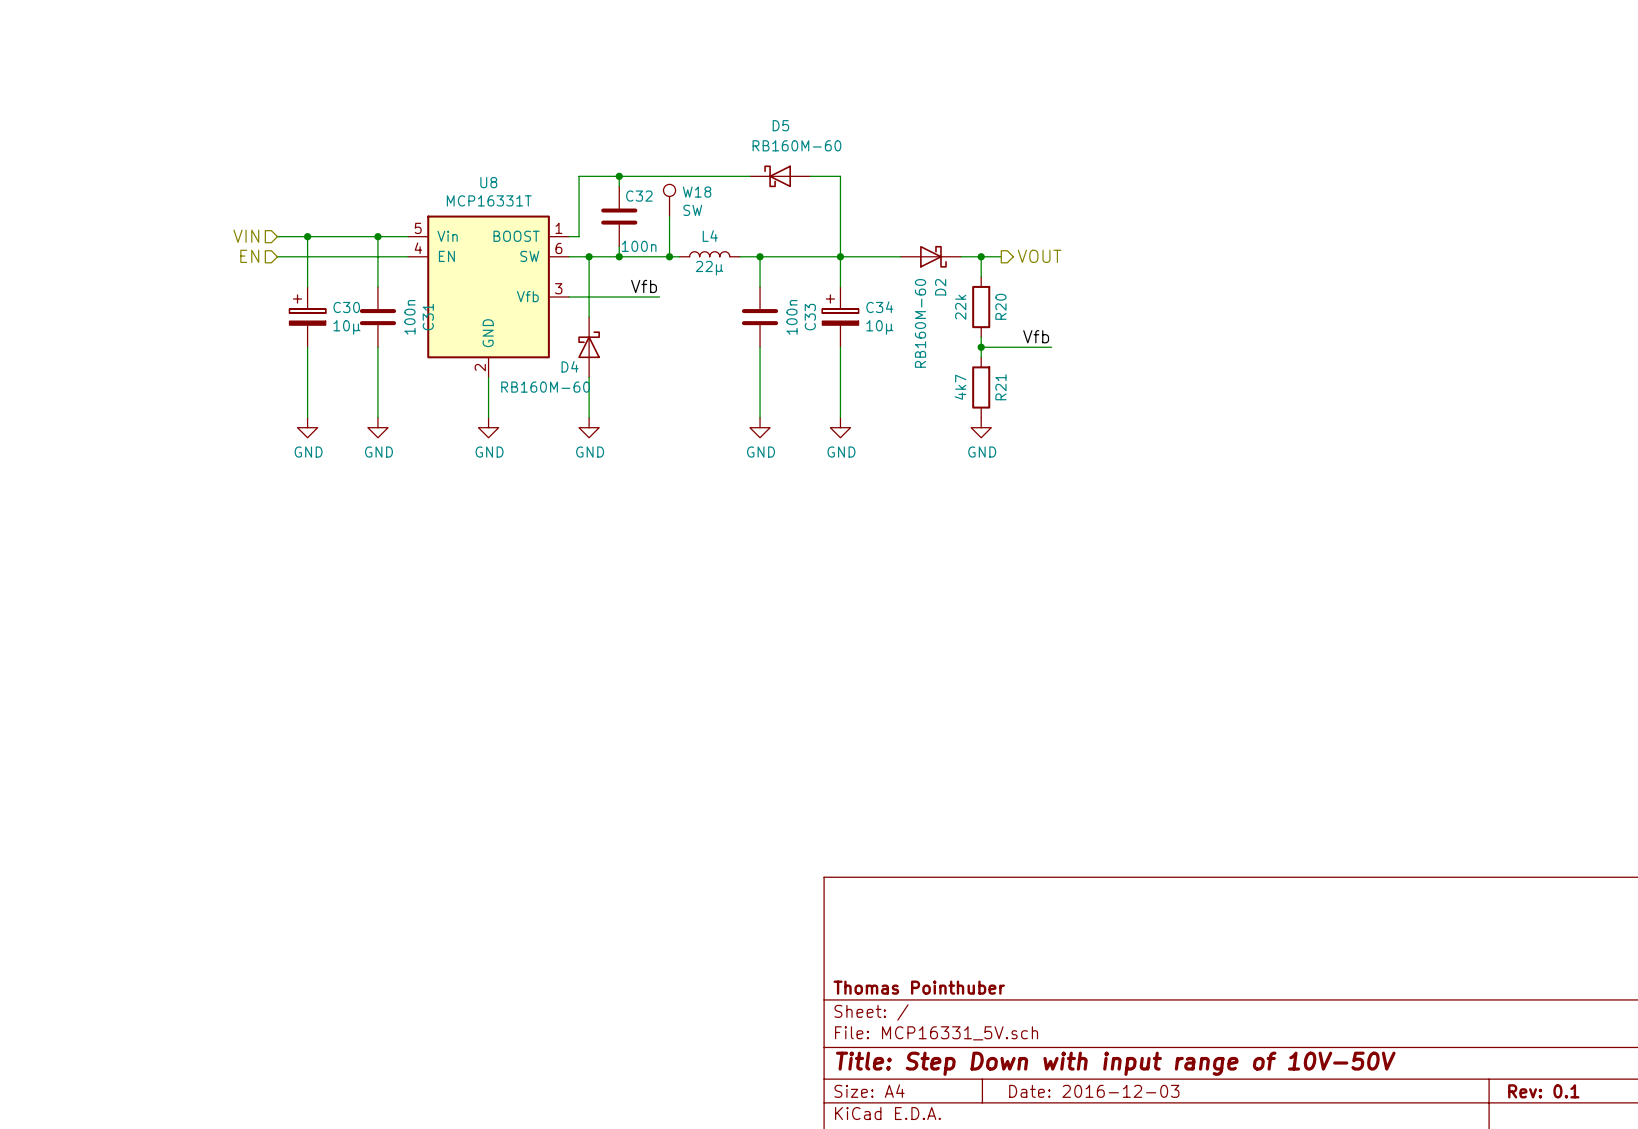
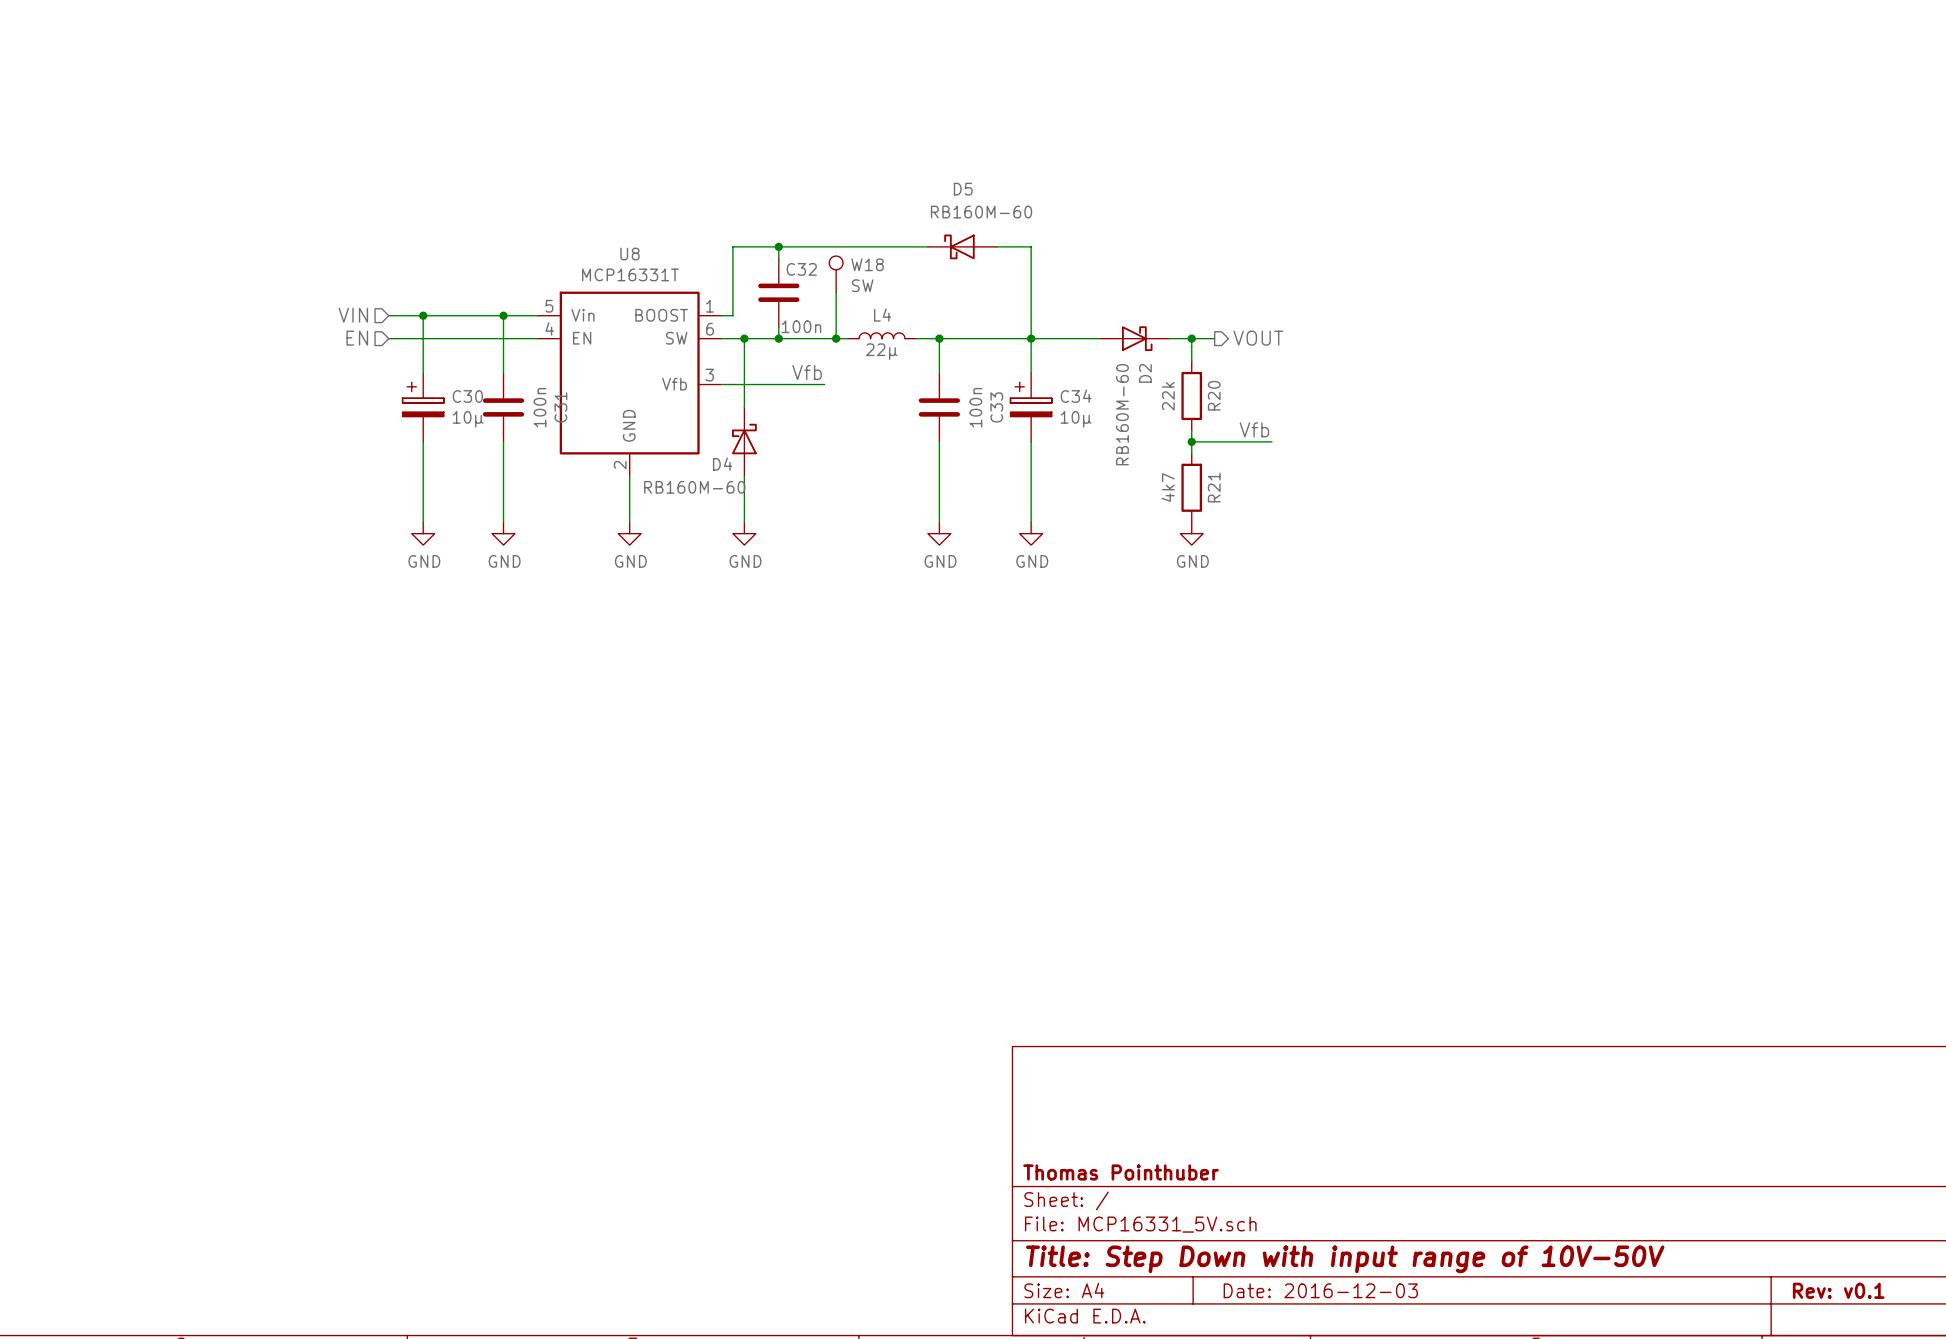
title block: Rev: 0.1 (1543, 1091) -> Rev: v0.1 (1838, 1290)

